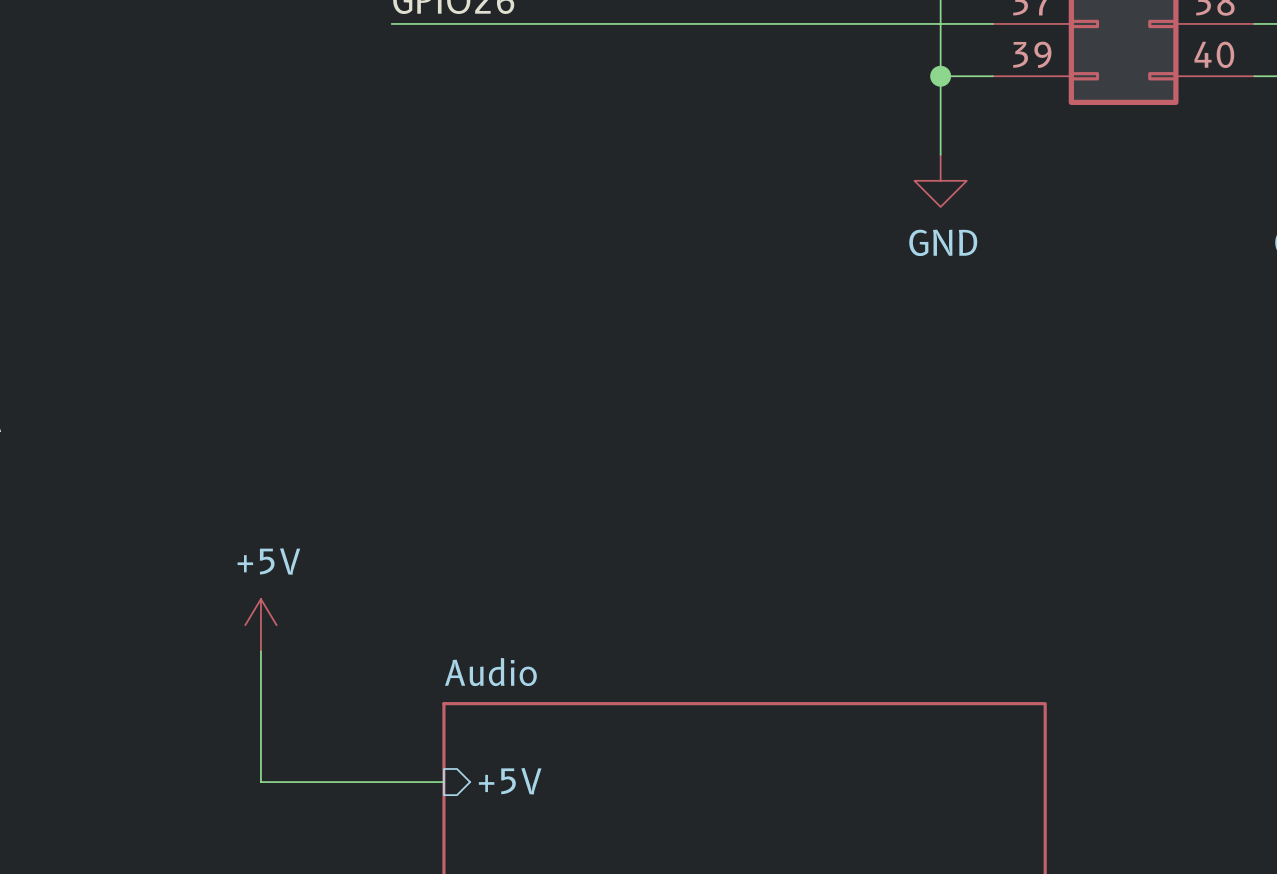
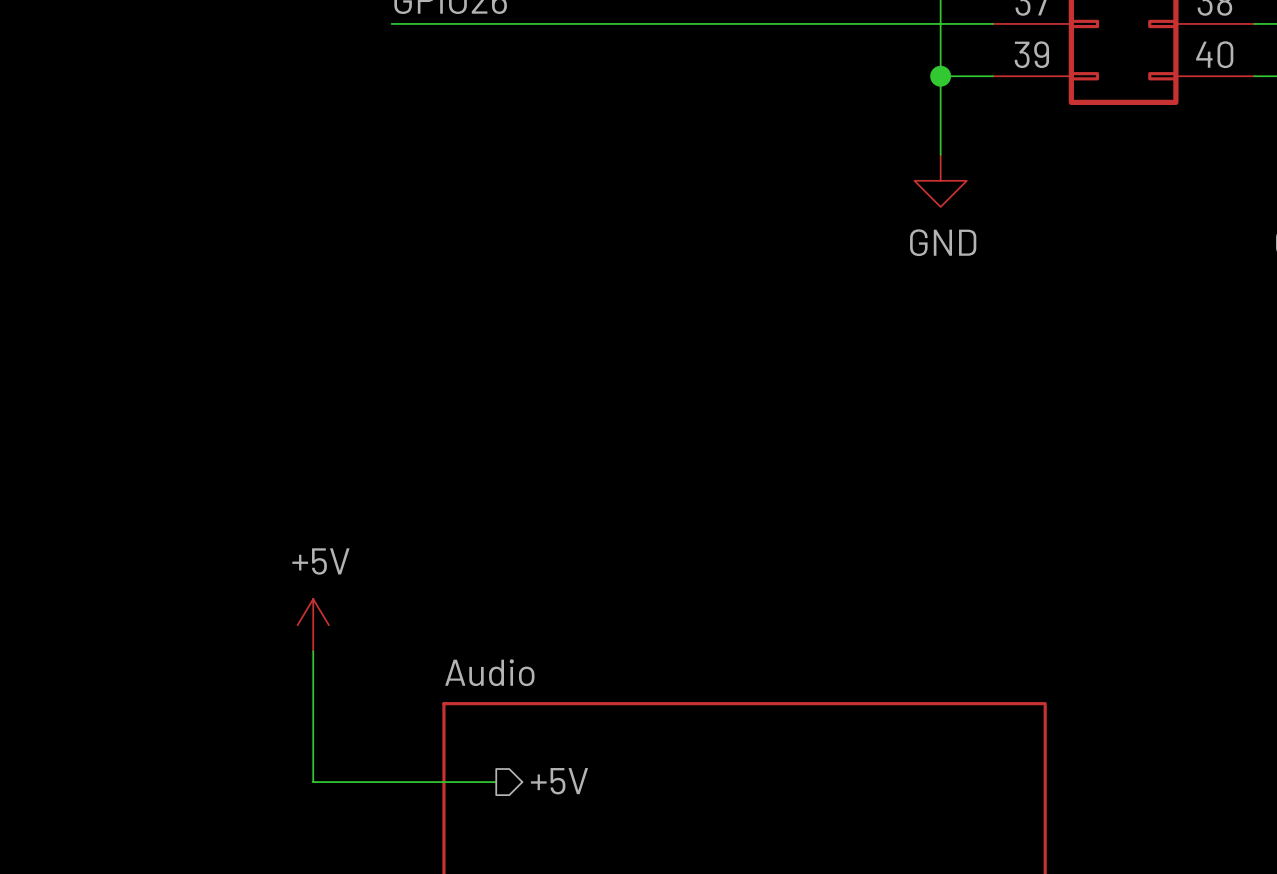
power symbol position: +5V (260, 625) -> +5V (313, 625)
wire: (260, 651) (260, 782) (313, 782) -> (313, 651) (313, 782)
sheet pin position: +5V (510, 781) -> +5V (559, 781)
wire: none -> (443, 782) (496, 782)

